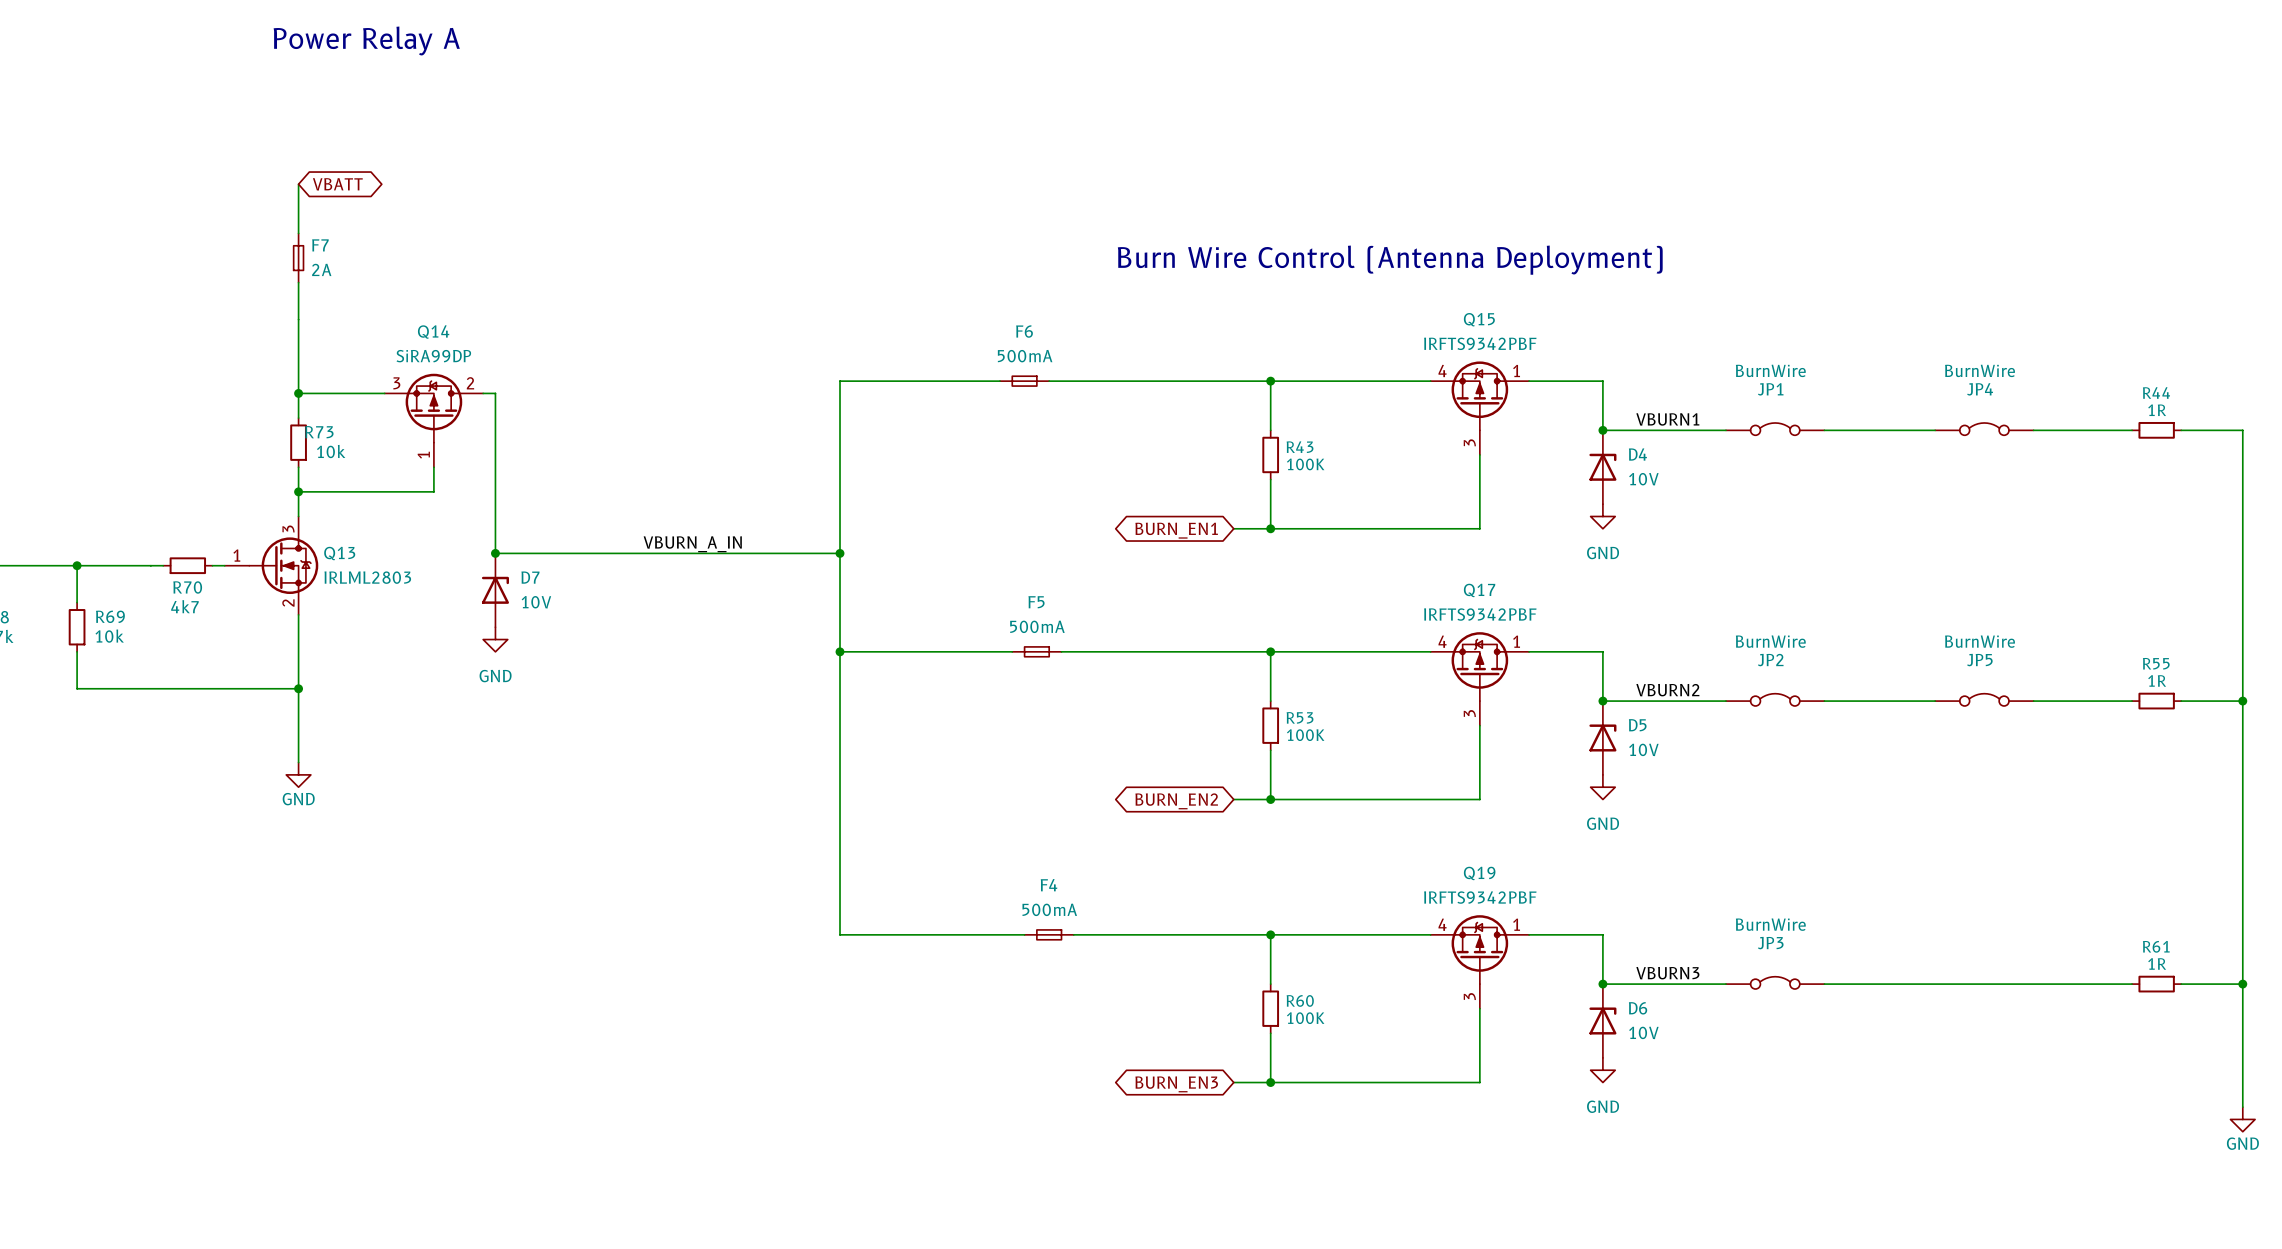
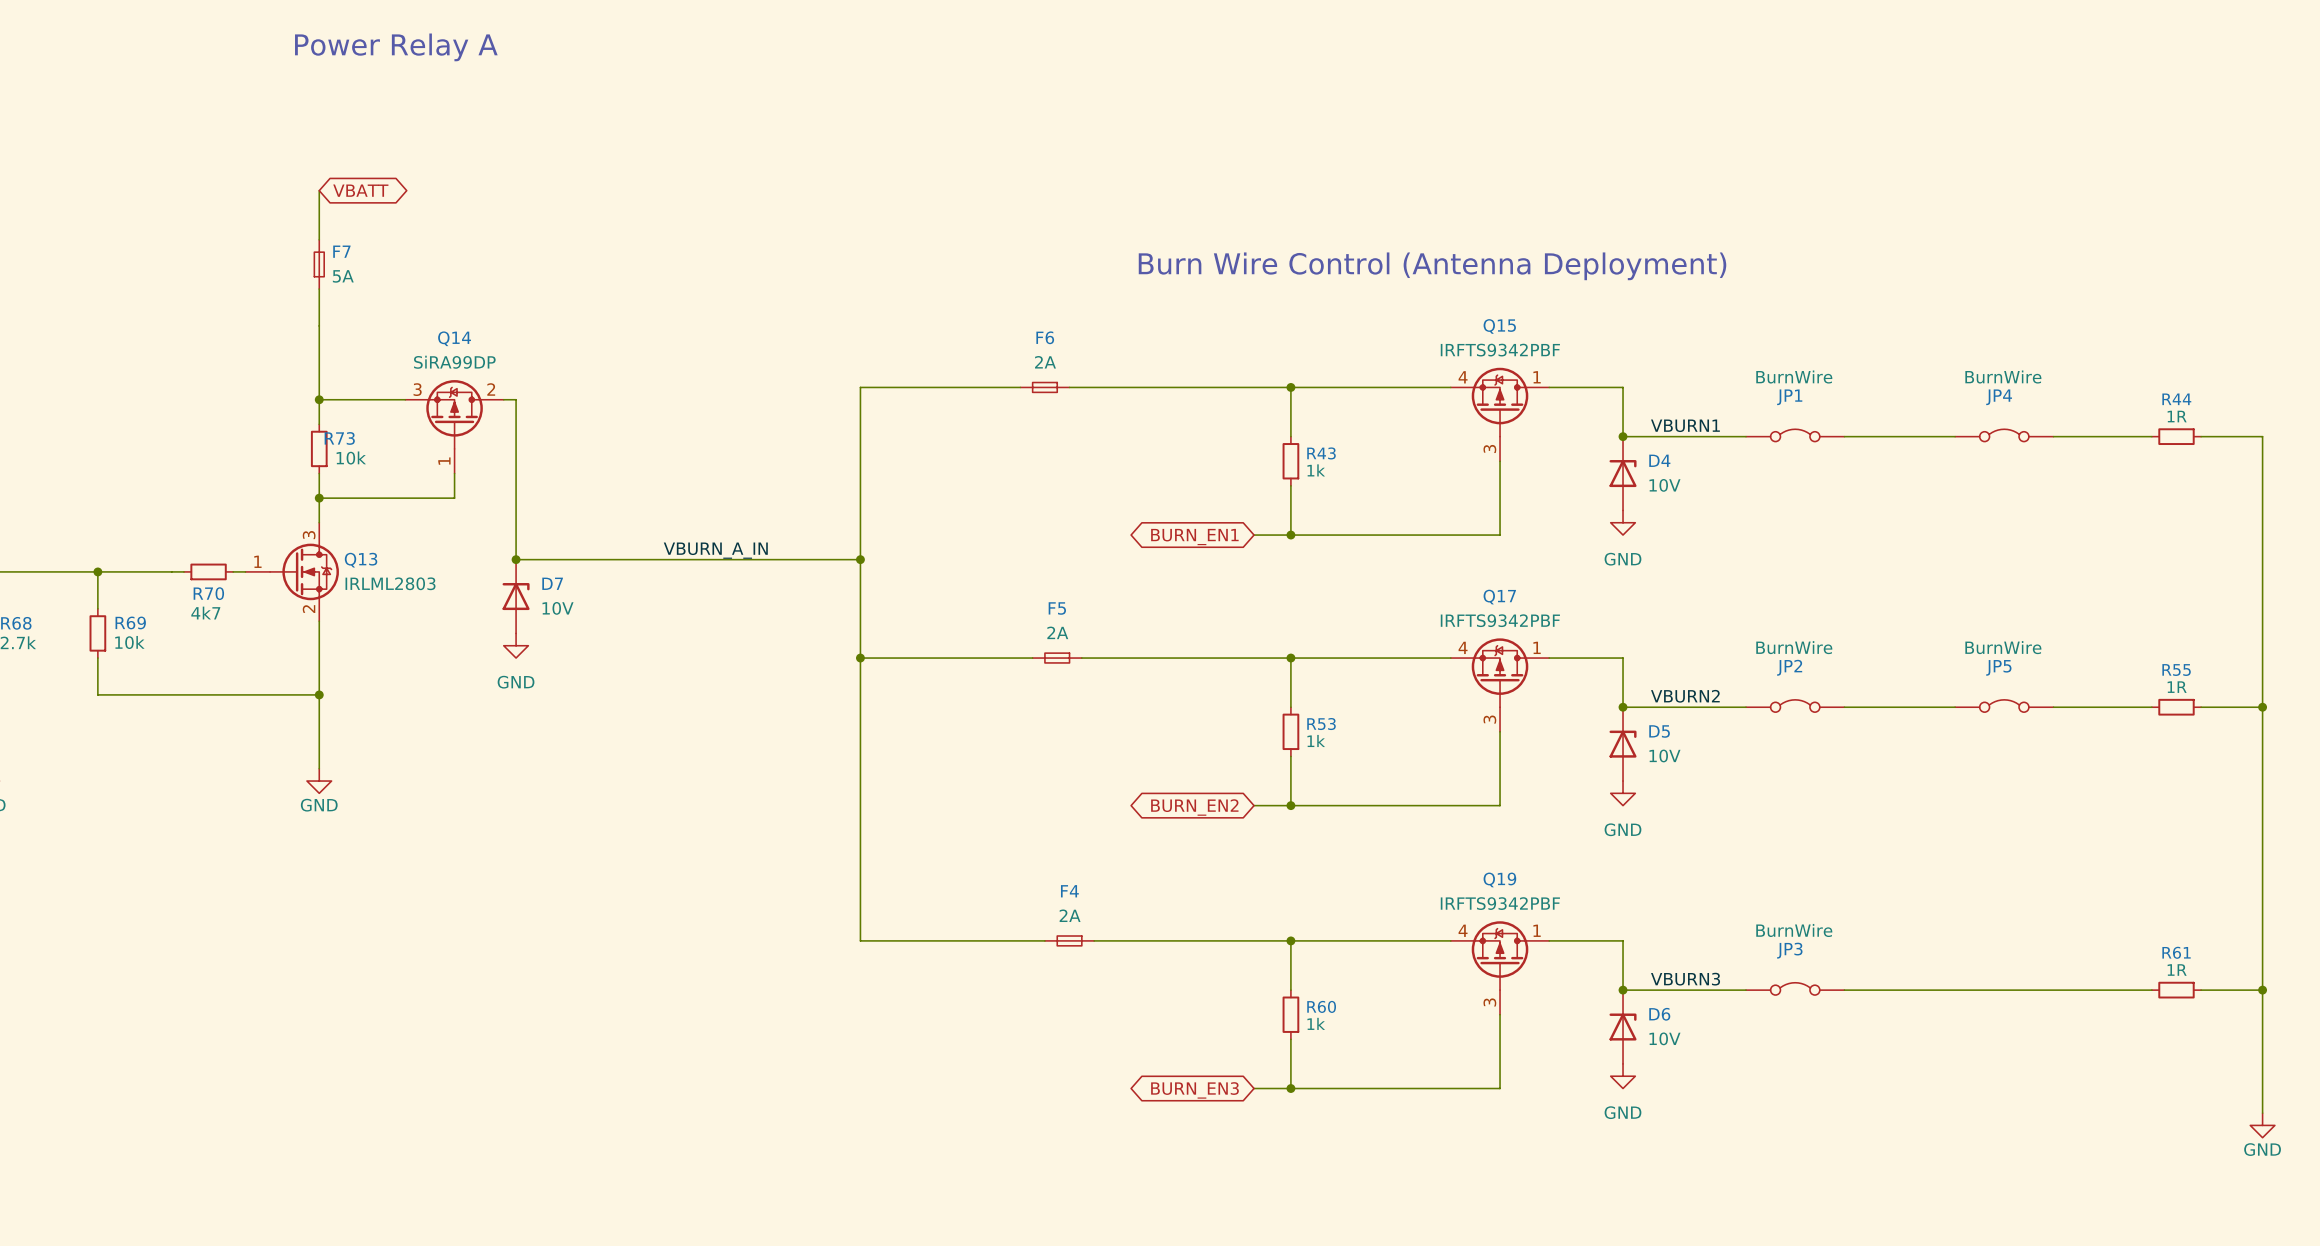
F7 value: 2A (321, 269) -> 5A (343, 276)
F6 value: 500mA (1025, 356) -> 2A (1045, 362)
R43 value: 100K (1305, 464) -> 1k (1316, 470)
F5 value: 500mA (1037, 626) -> 2A (1057, 632)
R53 value: 100K (1305, 735) -> 1k (1316, 740)
F4 value: 500mA (1049, 909) -> 2A (1070, 915)
R60 value: 100K (1305, 1018) -> 1k (1316, 1023)

